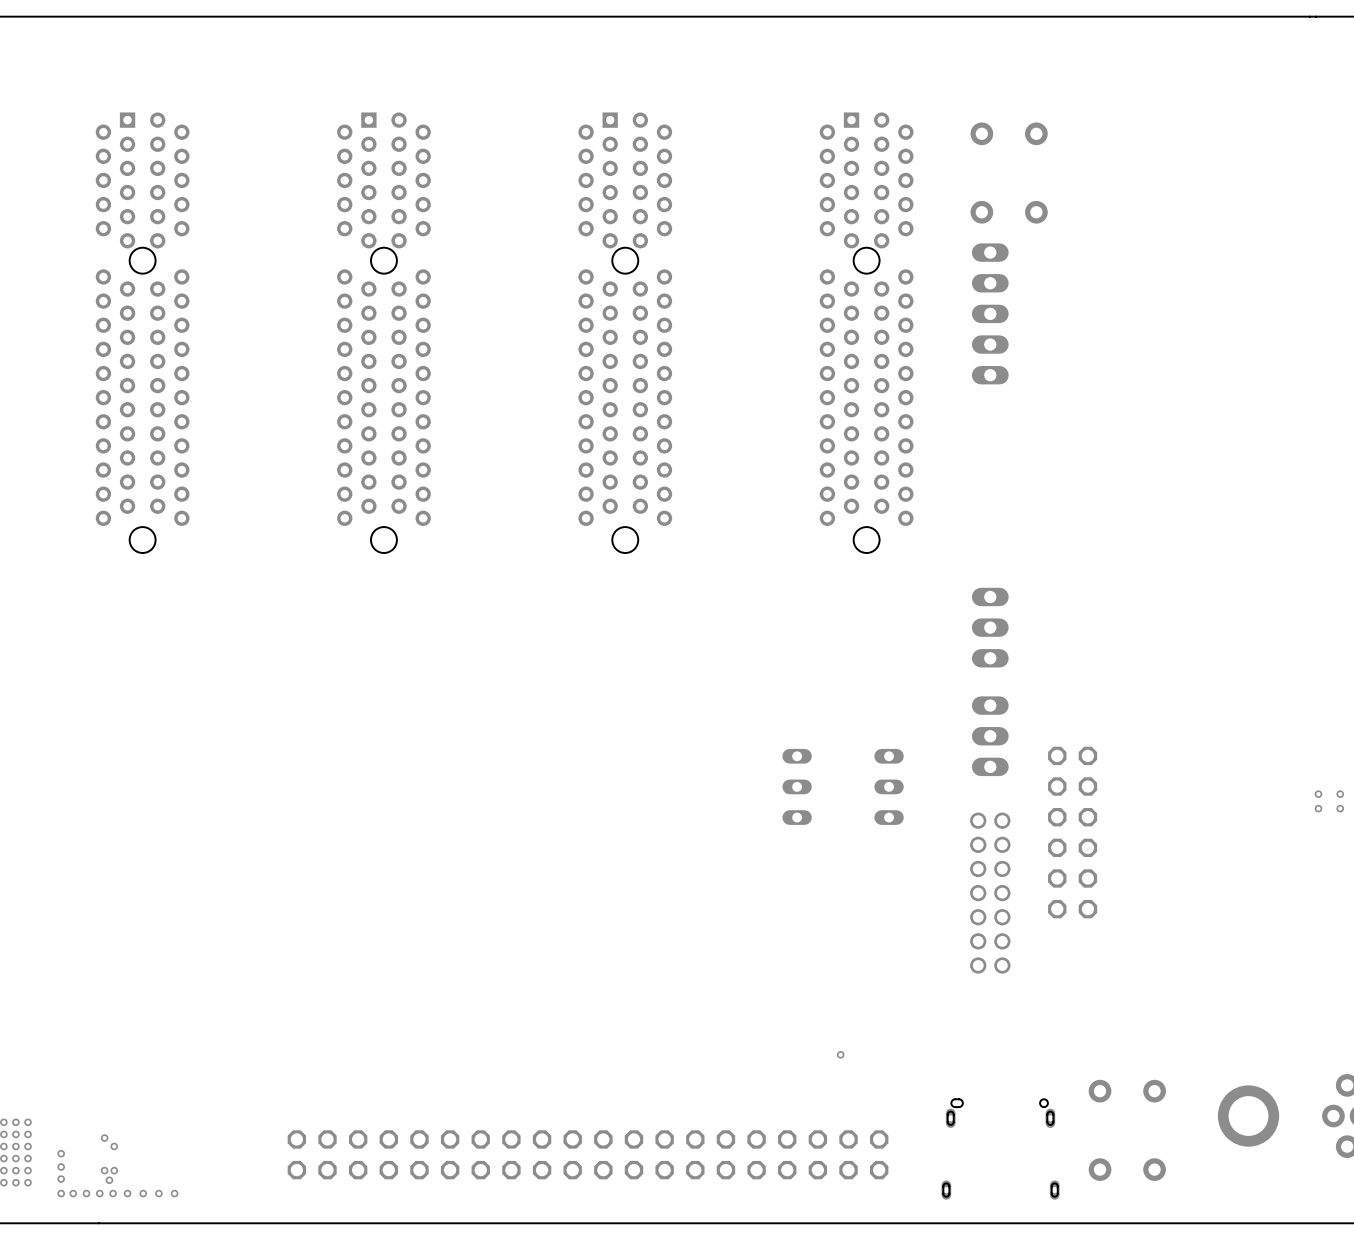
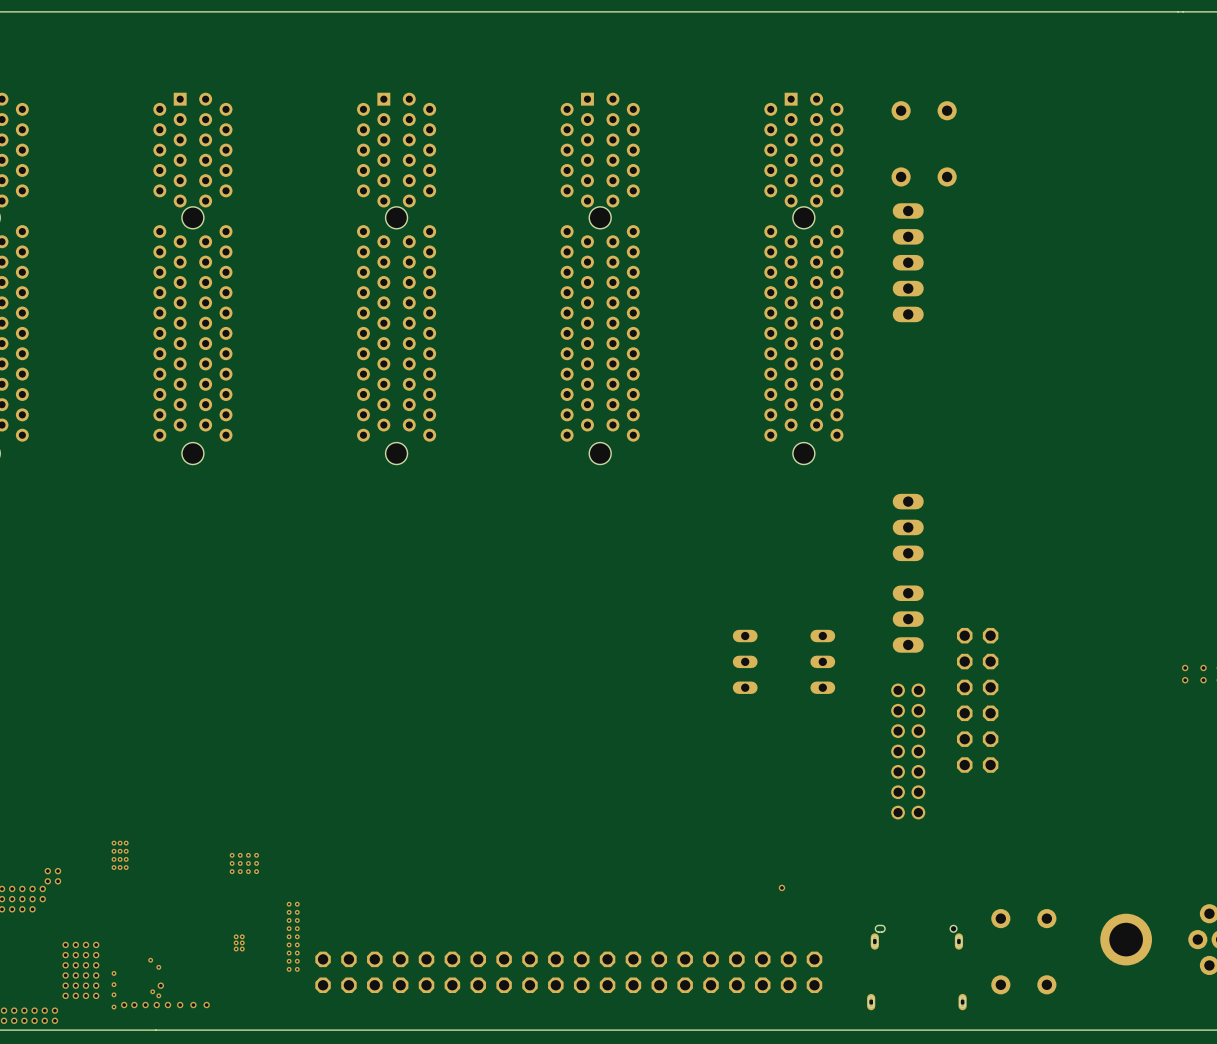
via: none -> (114, 843)
via: none -> (120, 843)
via: none -> (126, 843)
via: none -> (114, 851)
via: none -> (120, 851)
via: none -> (126, 851)
via: none -> (232, 855)
via: none -> (240, 855)
via: none -> (248, 855)
via: none -> (256, 855)
via: none -> (114, 859)
via: none -> (120, 859)
via: none -> (126, 859)
via: none -> (232, 863)
via: none -> (240, 863)
via: none -> (248, 863)
via: none -> (256, 863)
via: none -> (114, 867)
via: none -> (120, 867)
via: none -> (126, 867)
via: none -> (232, 871)
via: none -> (240, 871)
via: none -> (248, 871)
via: none -> (256, 871)
via: none -> (289, 904)
via: none -> (297, 904)
via: none -> (289, 912)
via: none -> (297, 912)
via: none -> (289, 920)
via: none -> (297, 920)
via: none -> (289, 928)
via: none -> (297, 928)
via: none -> (236, 936)
via: none -> (242, 936)
via: none -> (289, 936)
via: none -> (297, 936)
via: none -> (236, 942)
via: none -> (242, 942)
via: none -> (289, 944)
via: none -> (297, 944)
via: none -> (236, 949)
via: none -> (242, 949)
via: none -> (289, 953)
via: none -> (297, 953)
via: (104, 1138) -> none
via: none -> (150, 960)
via: none -> (289, 961)
via: none -> (297, 961)
via: (114, 1146) -> none
via: none -> (158, 967)
via: none -> (289, 969)
via: none -> (297, 969)
via: (61, 1153) -> none
via: none -> (114, 973)
via: (61, 1167) -> none
via: none -> (114, 984)
via: (114, 1170) -> none
via: none -> (152, 991)
via: (61, 1179) -> none
via: (109, 1180) -> none
via: none -> (114, 994)
via: none -> (158, 995)
via: (174, 1193) -> none
via: none -> (114, 1007)

